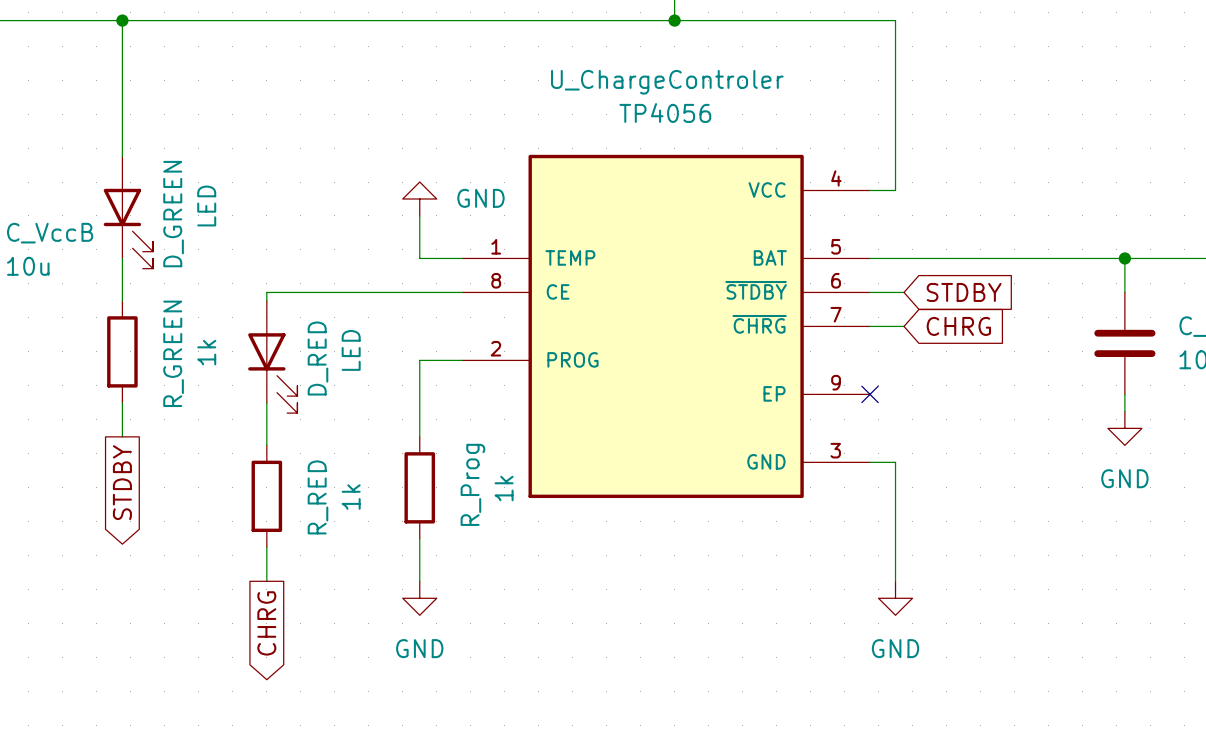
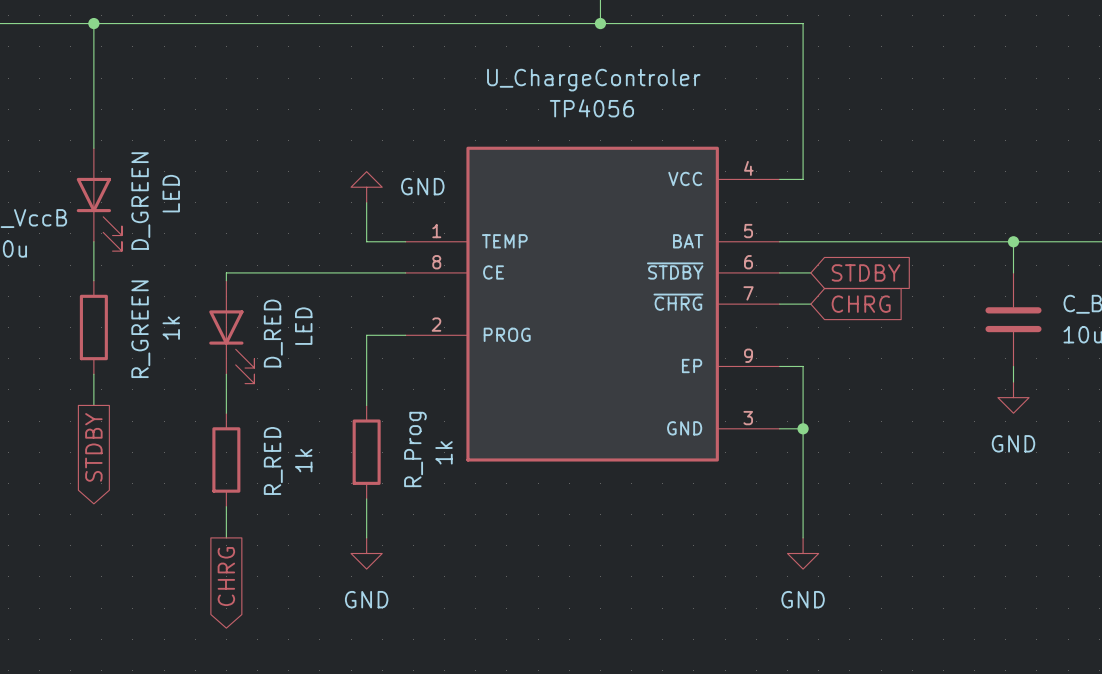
wire: none -> (779, 366) (803, 366) (803, 428)
no-connect mark: (870, 394) -> none
junction: none -> (803, 428)

